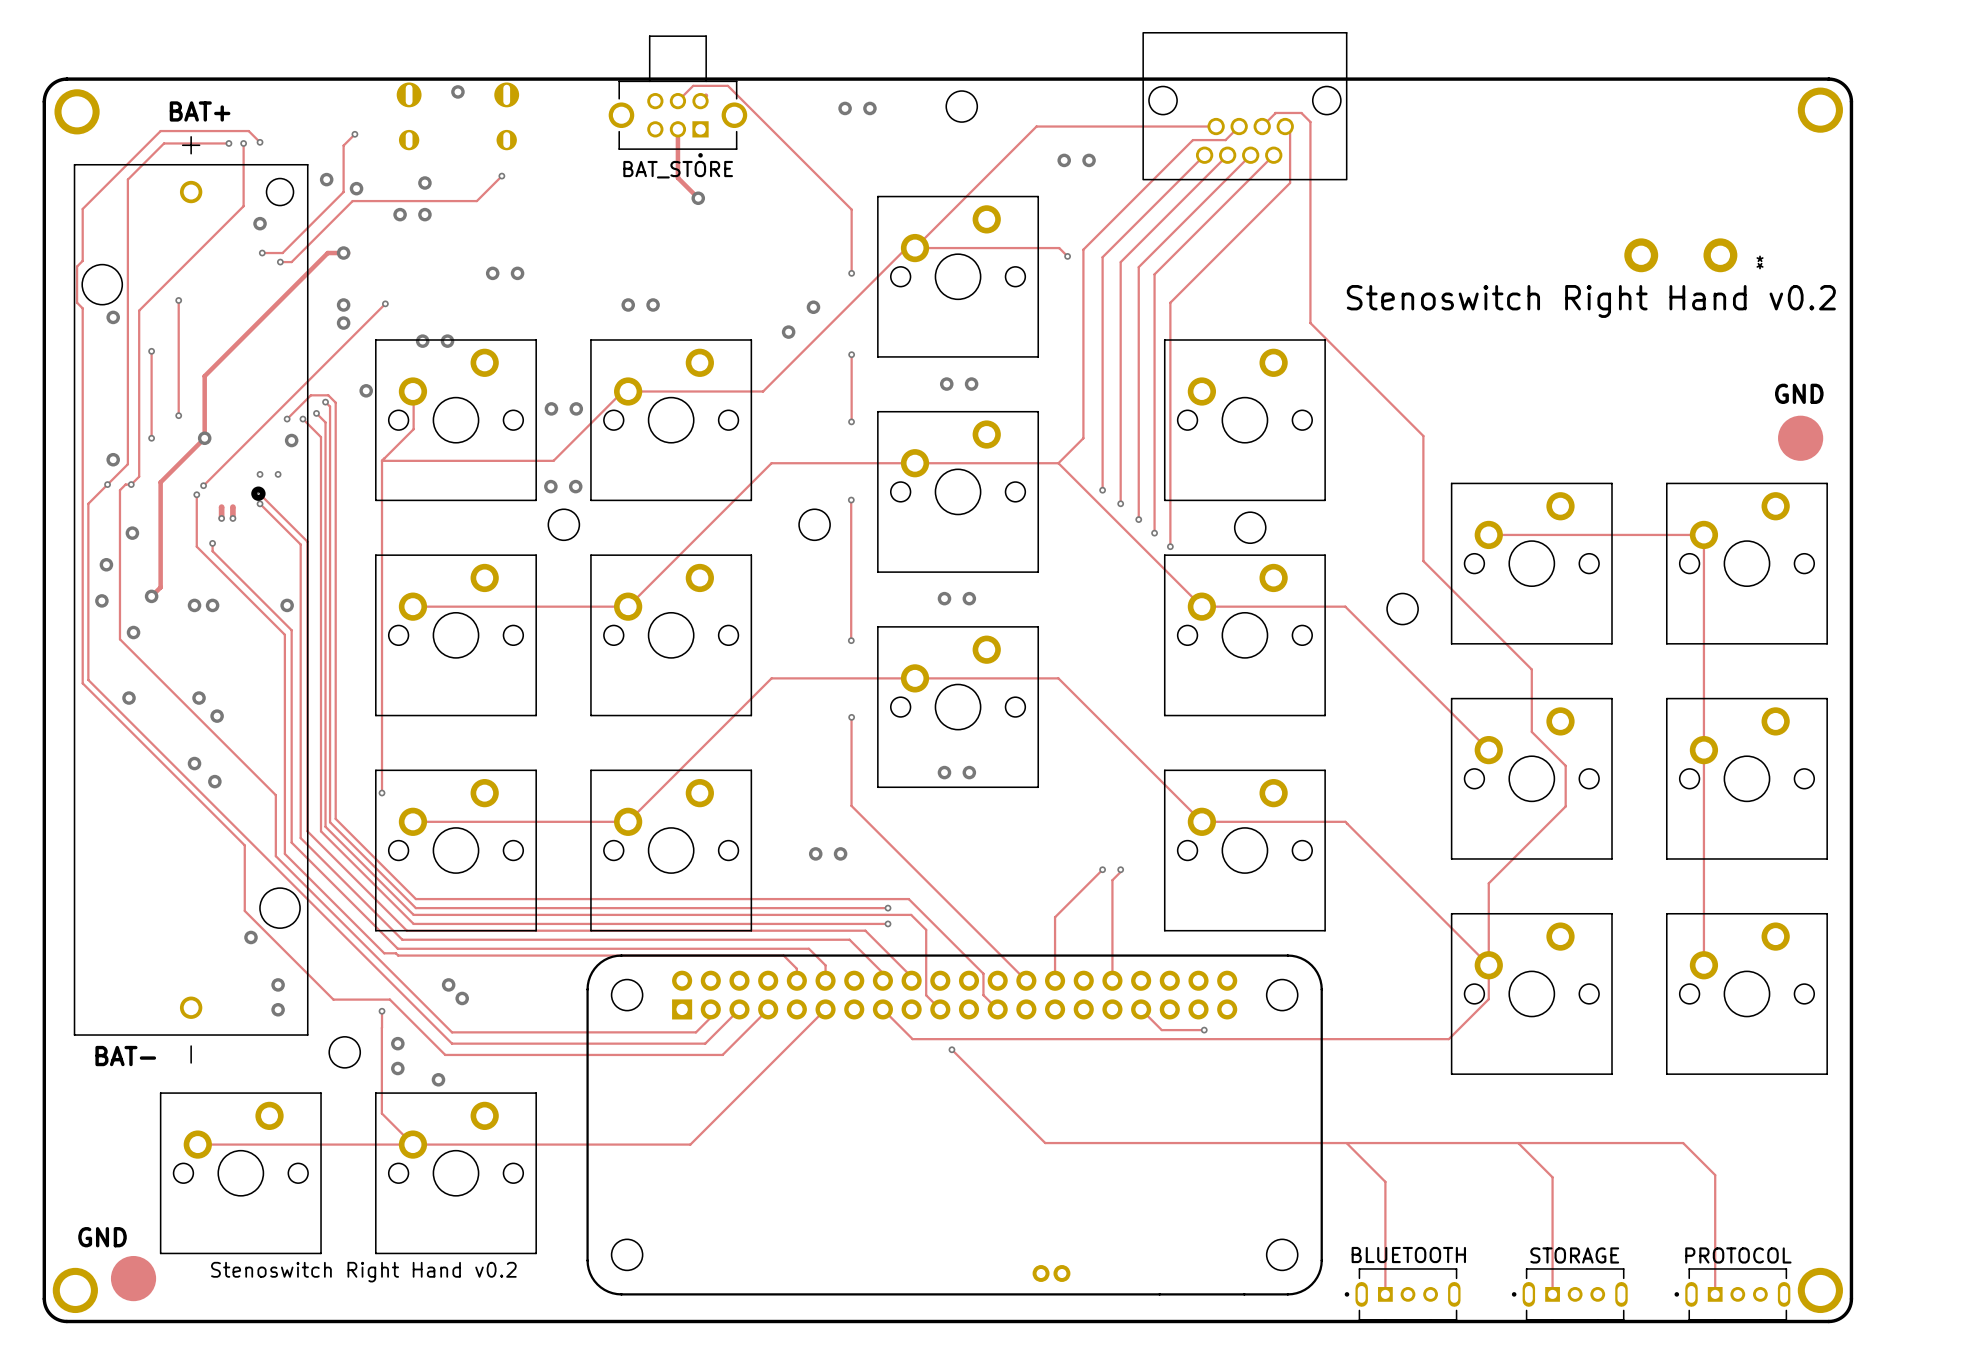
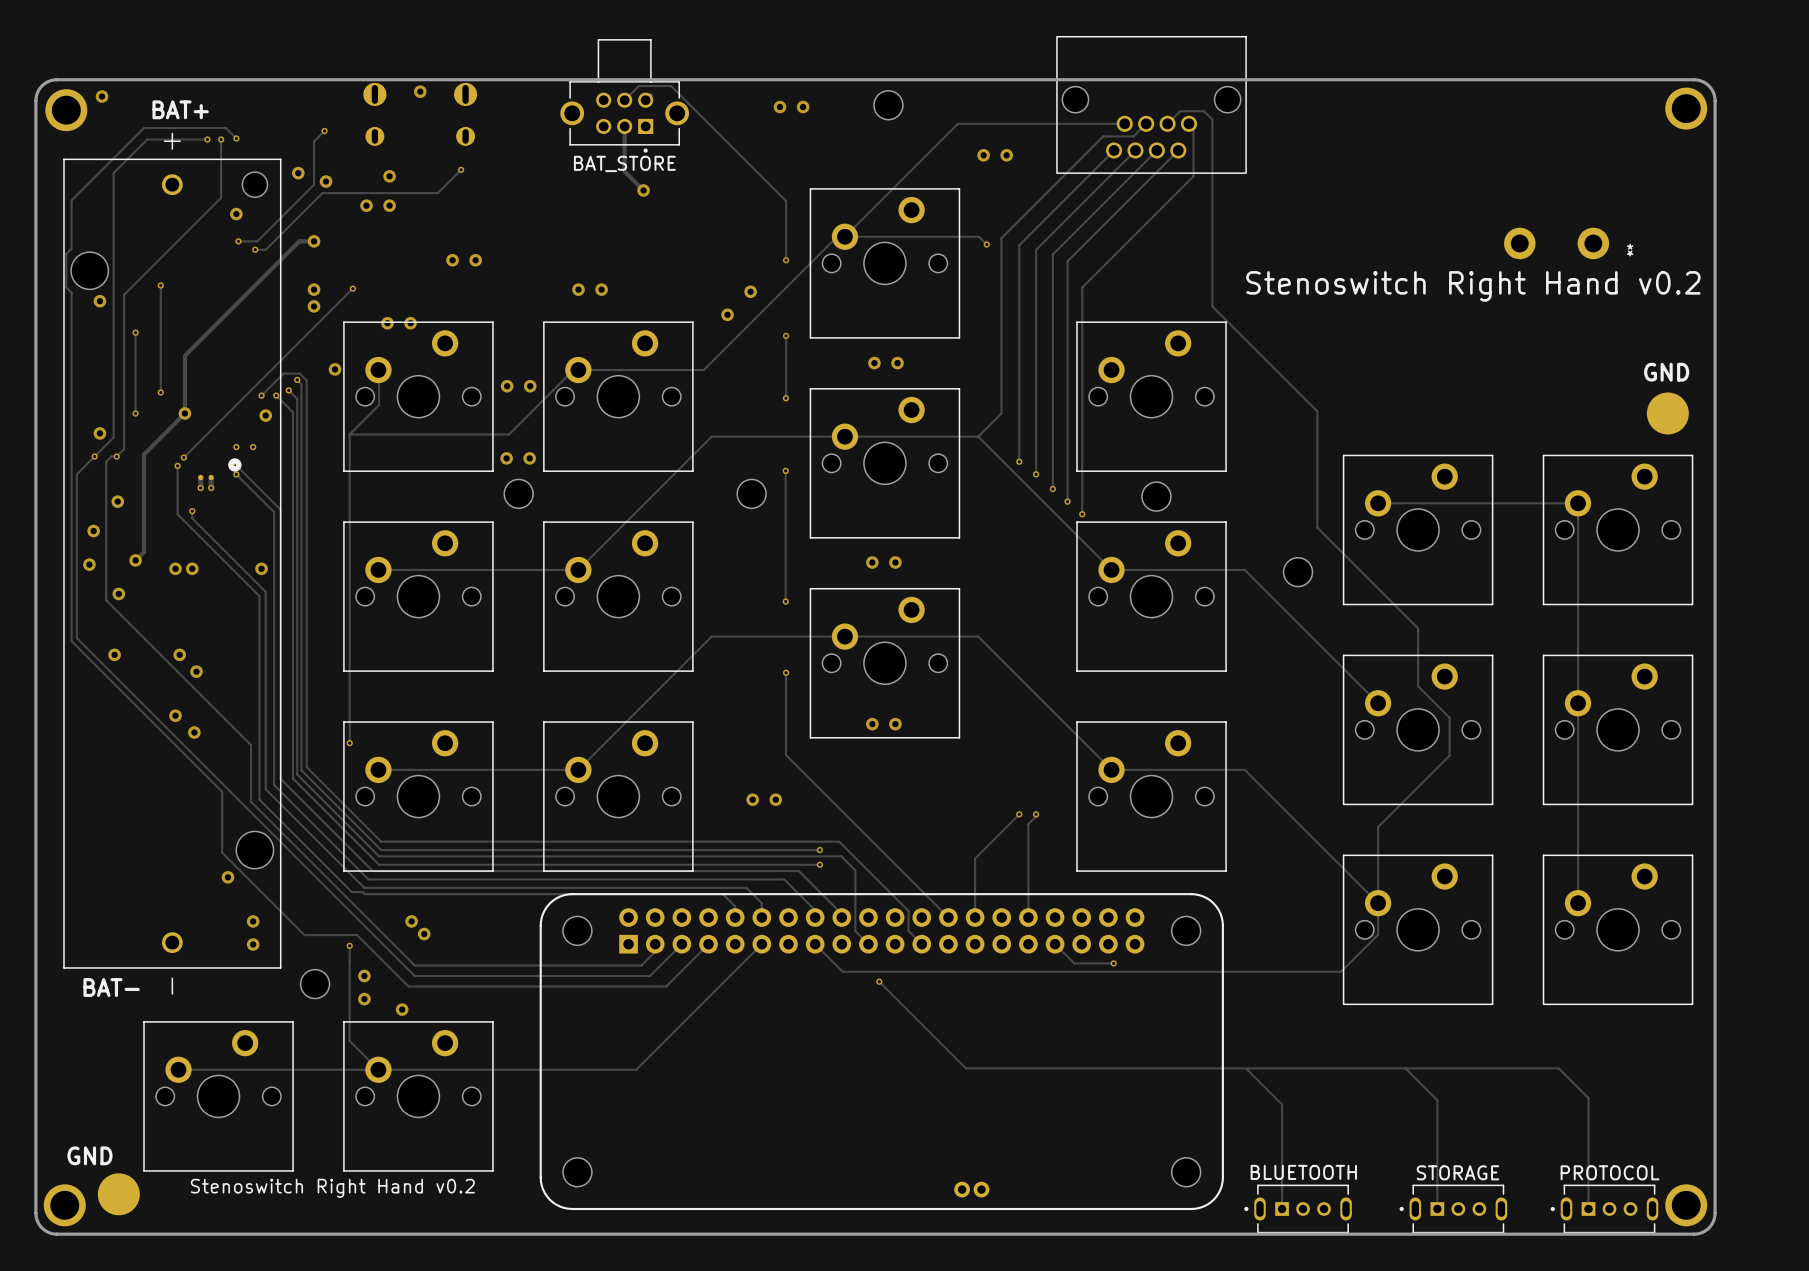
via: none -> (102, 96)

